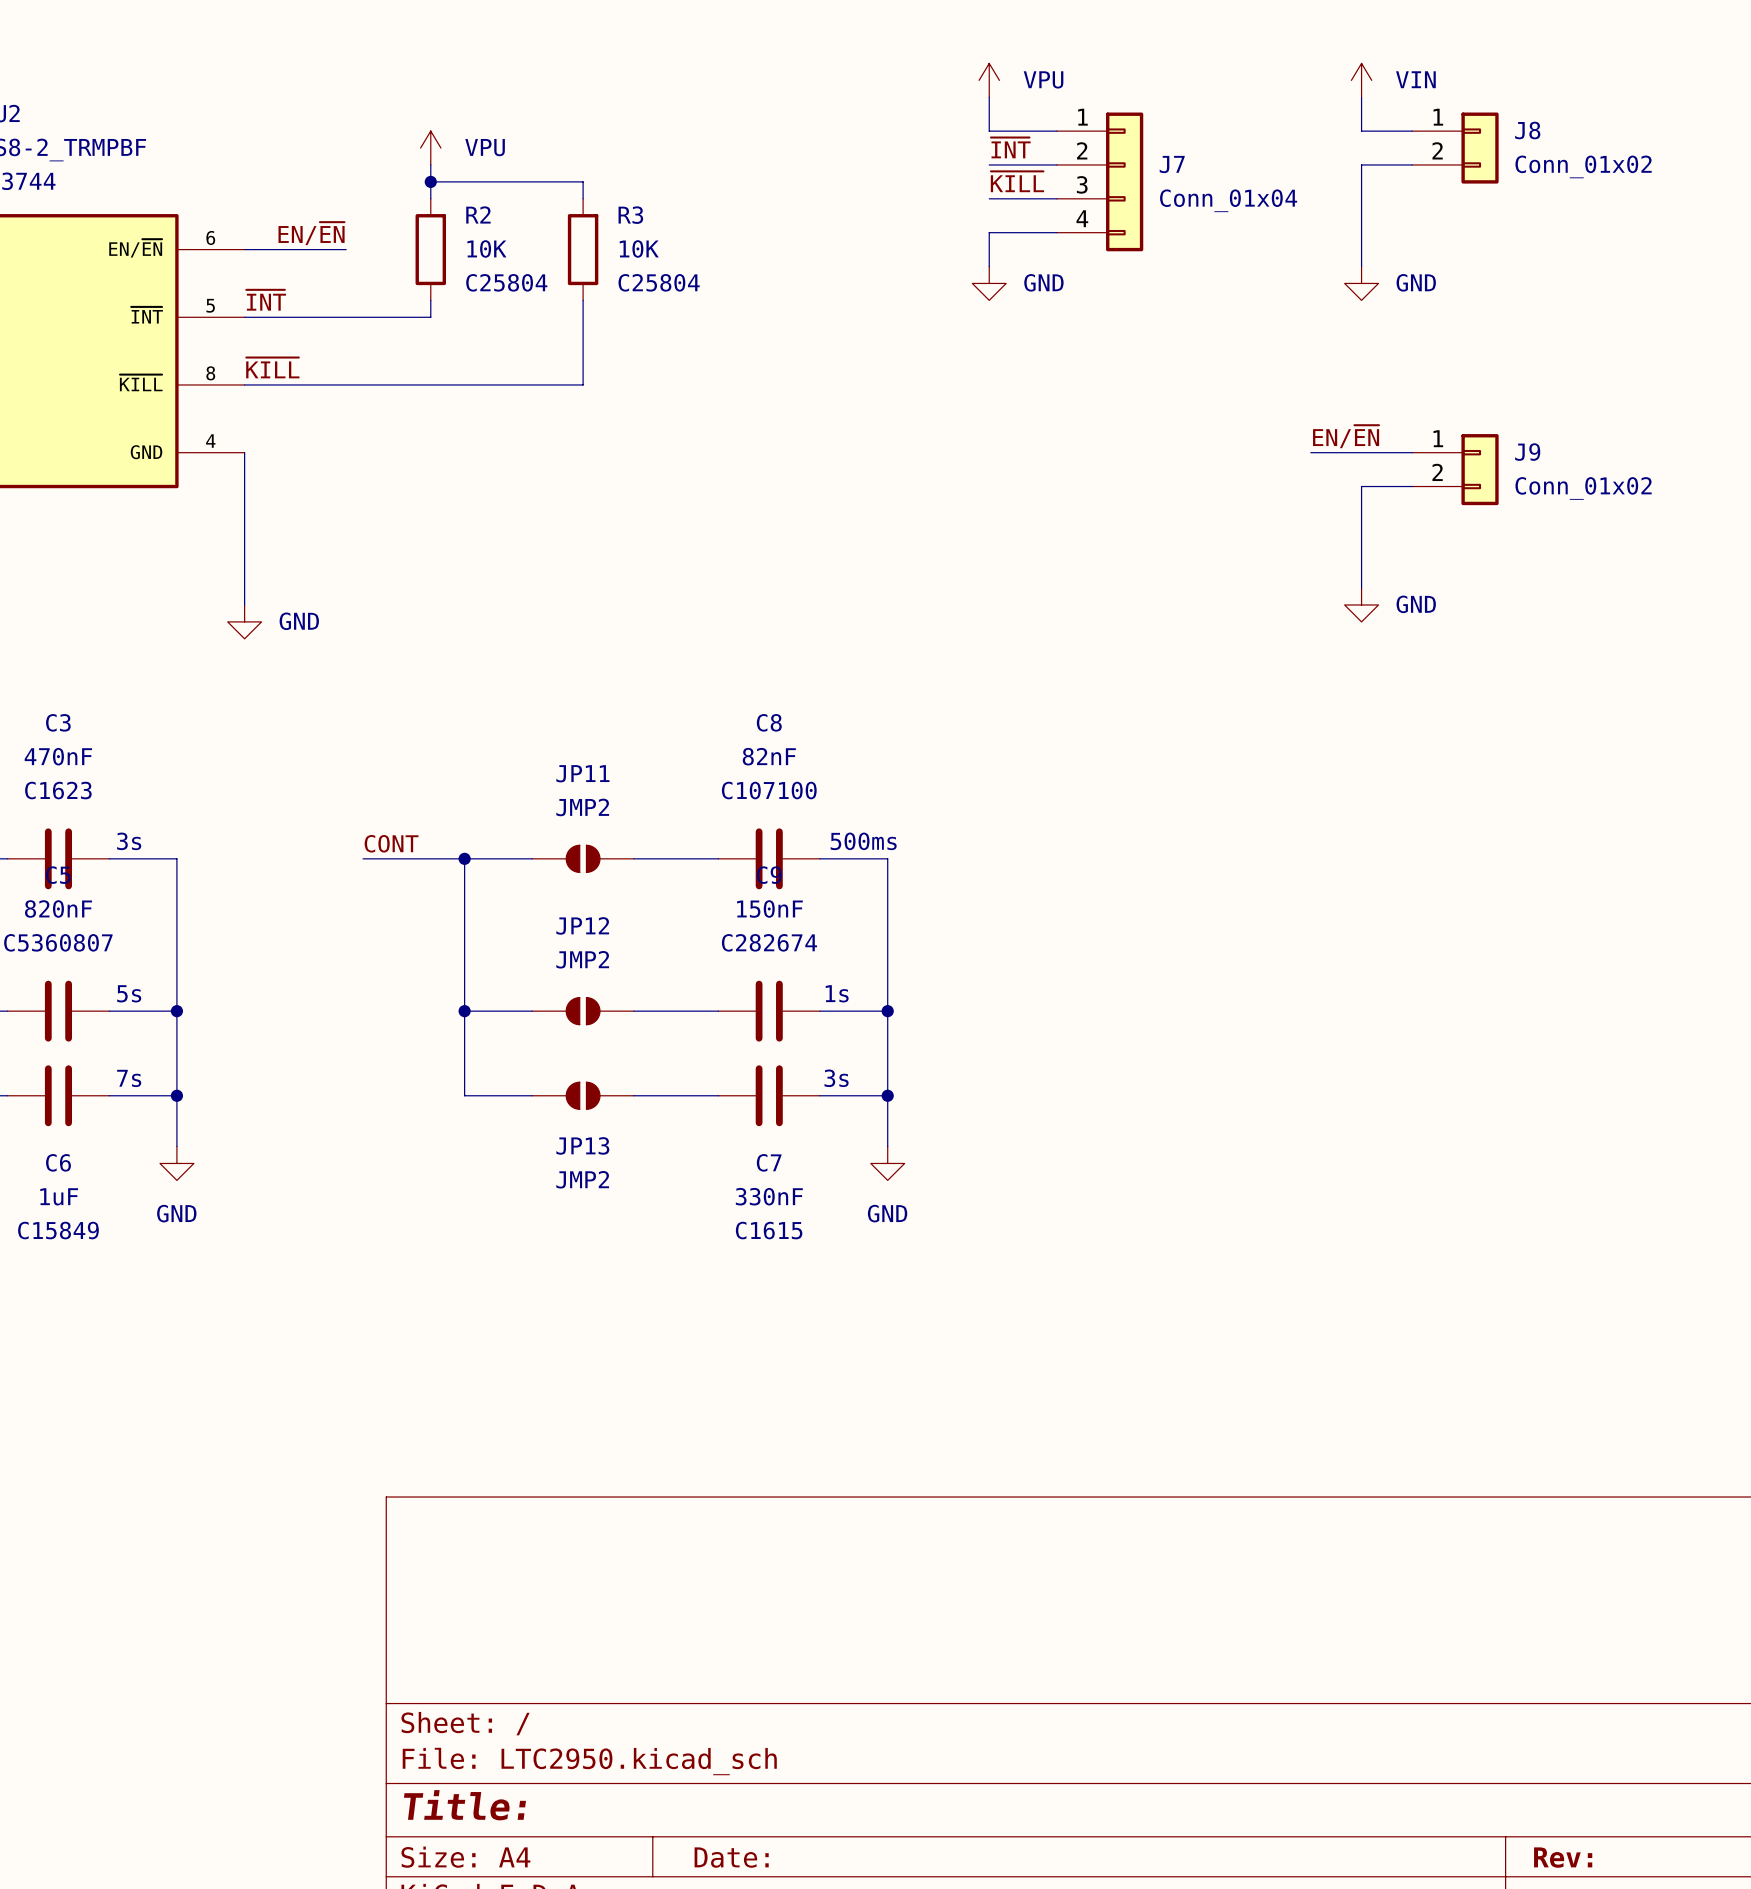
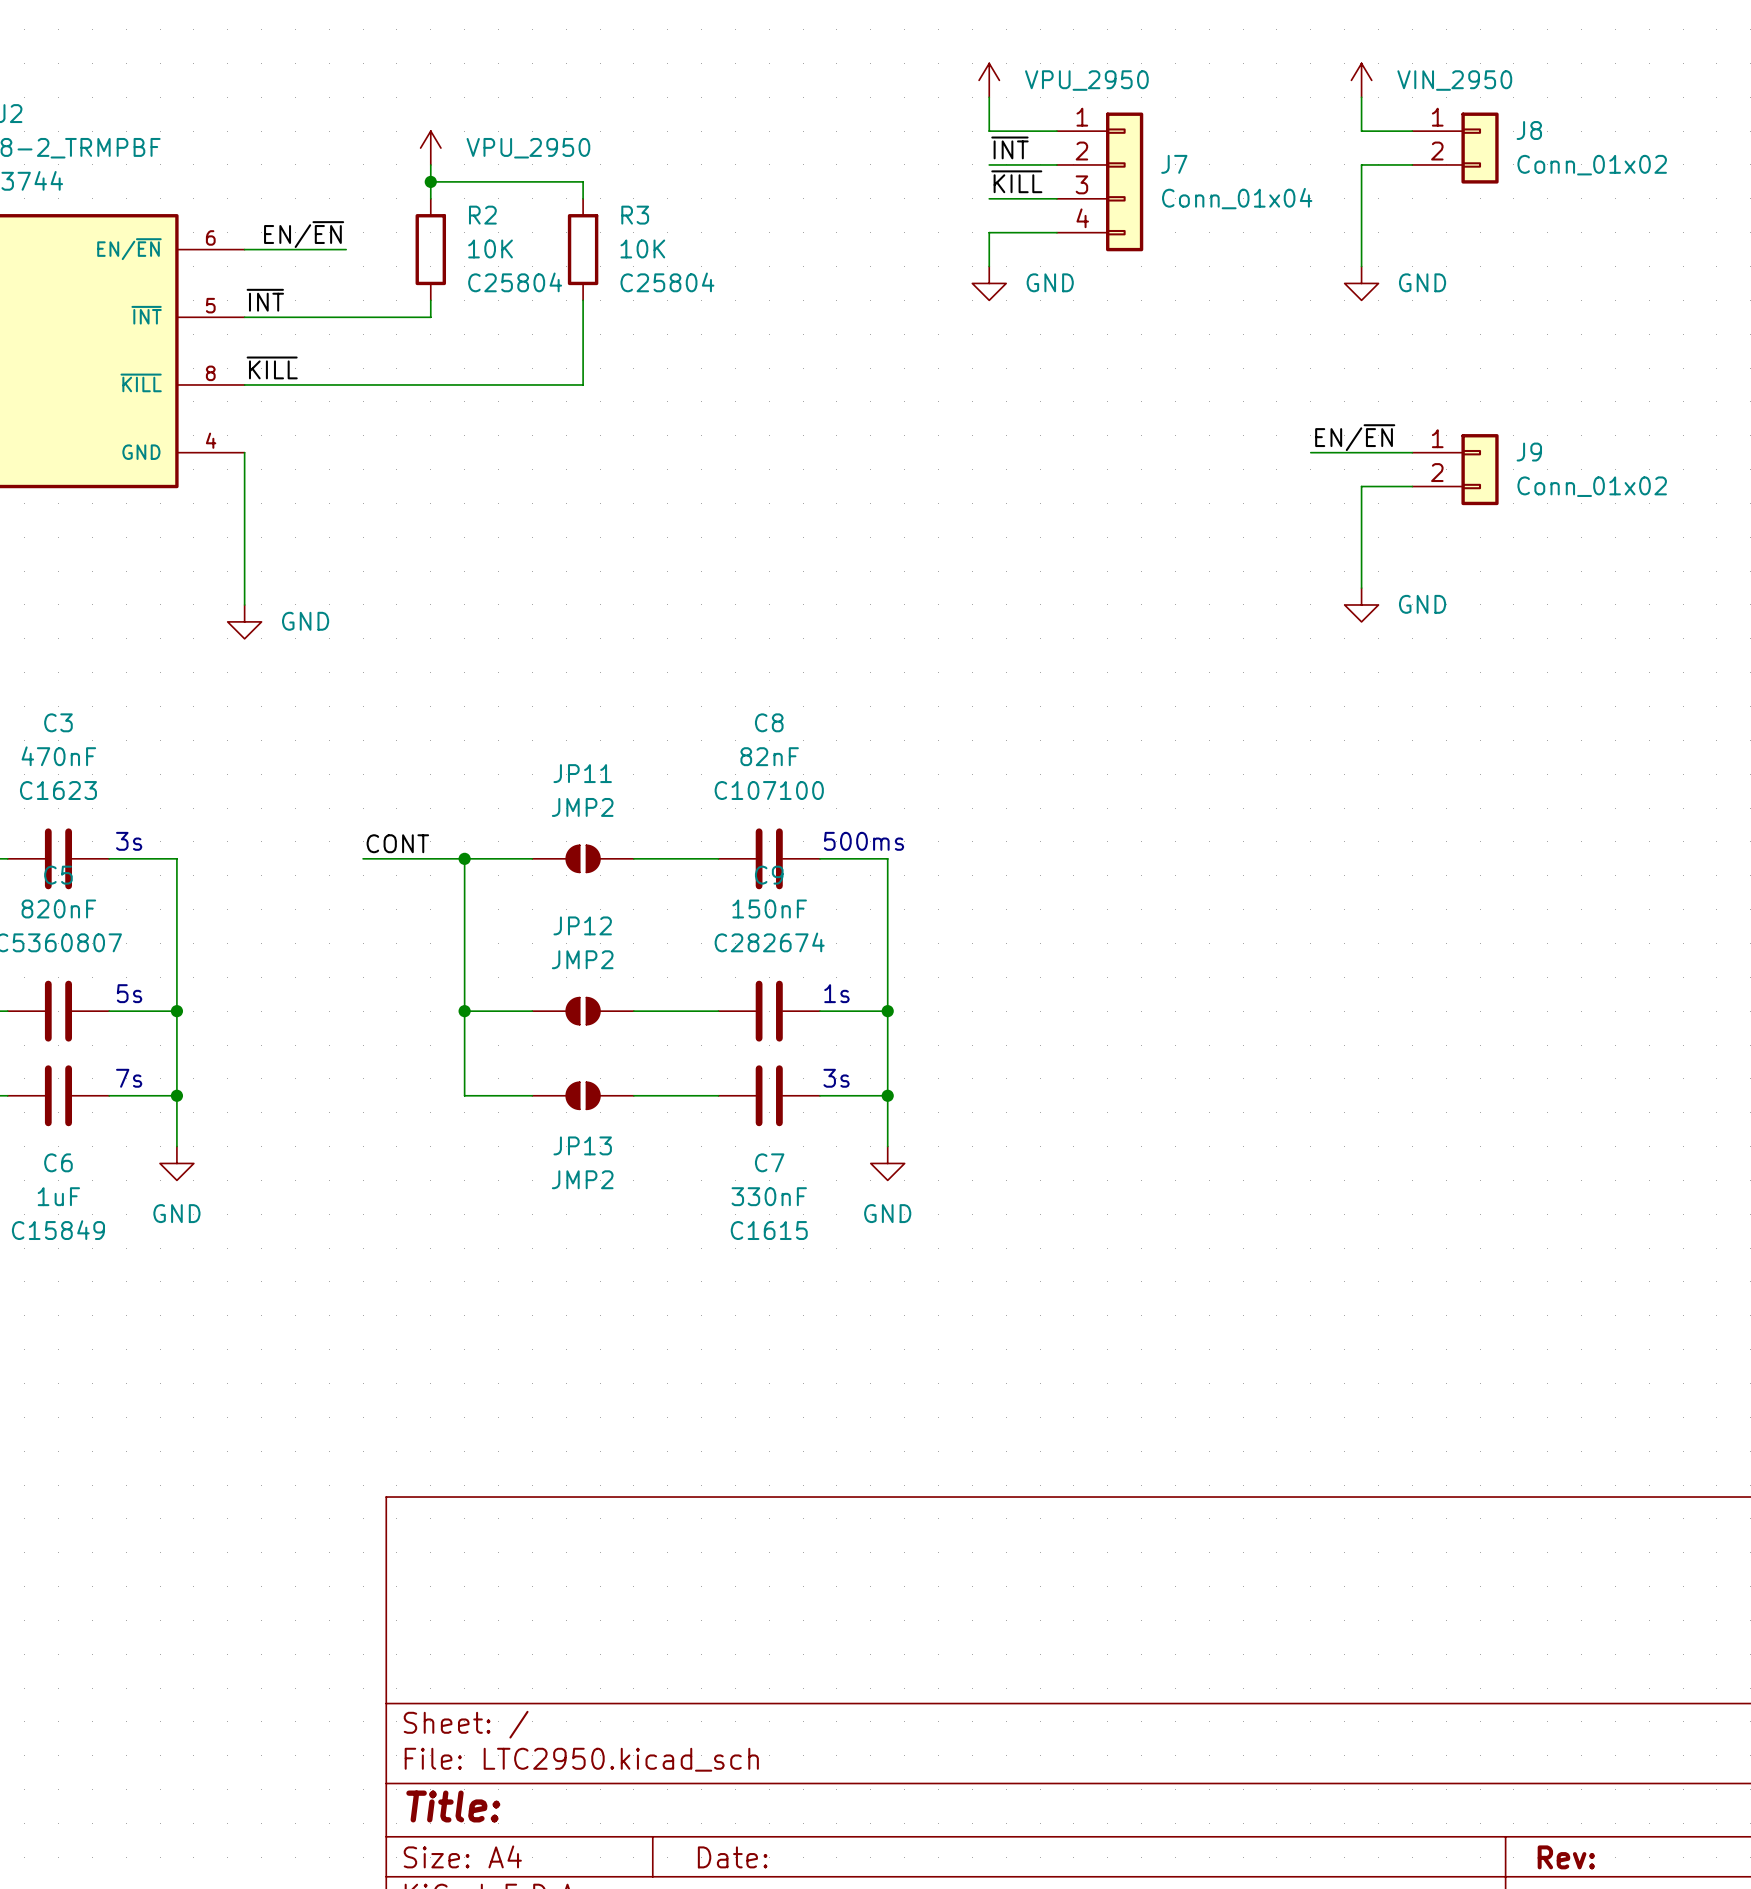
power symbol: VPU (989, 80) -> VPU_2950 (989, 80)
power symbol: VIN (1361, 80) -> VIN_2950 (1361, 80)
power symbol: VPU (430, 148) -> VPU_2950 (430, 148)

